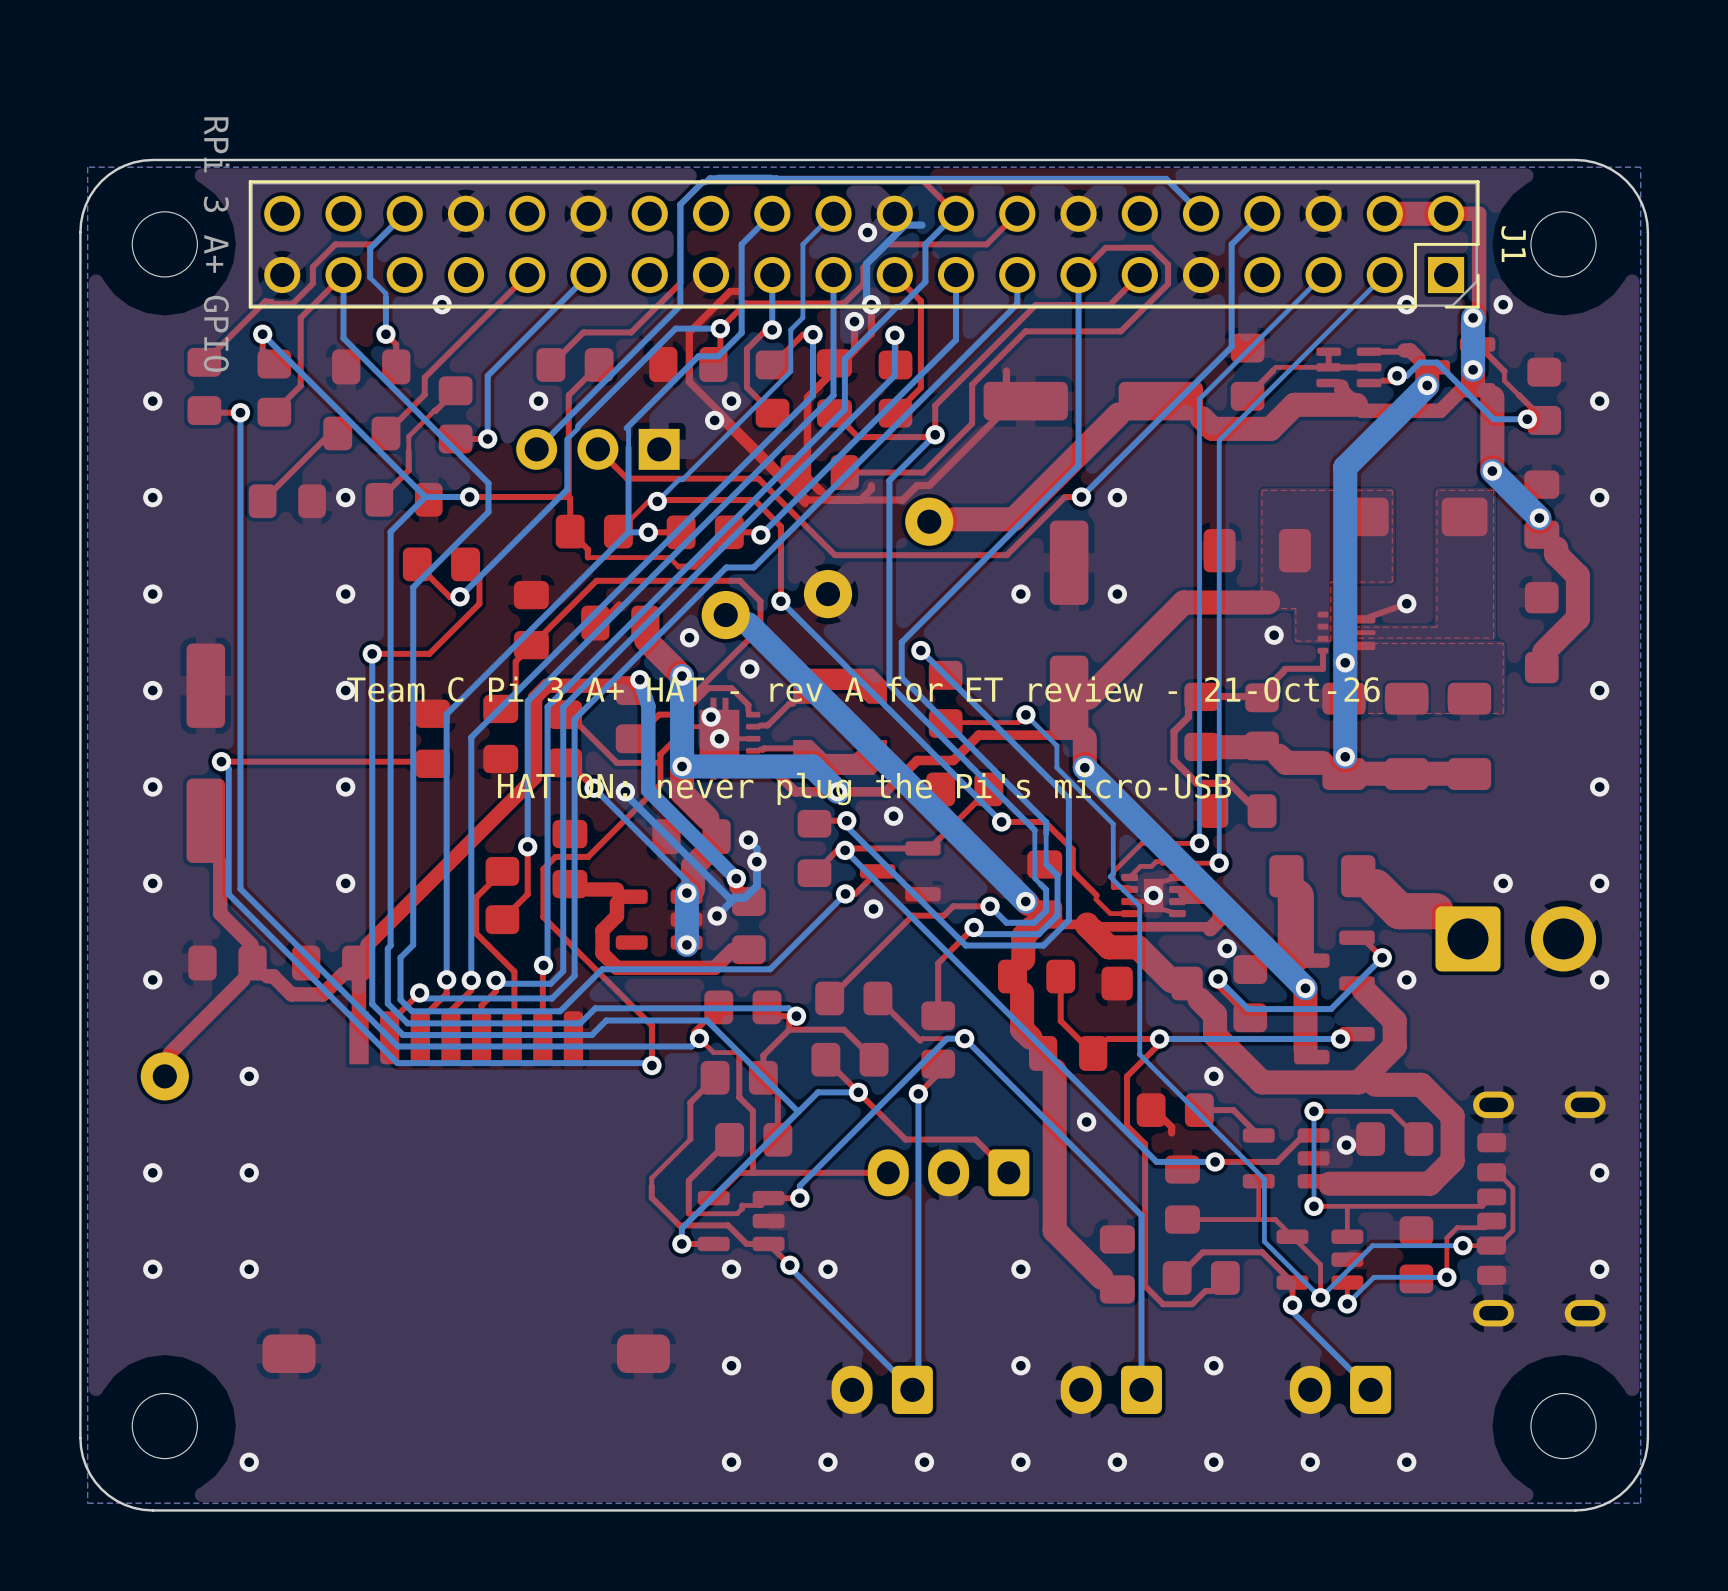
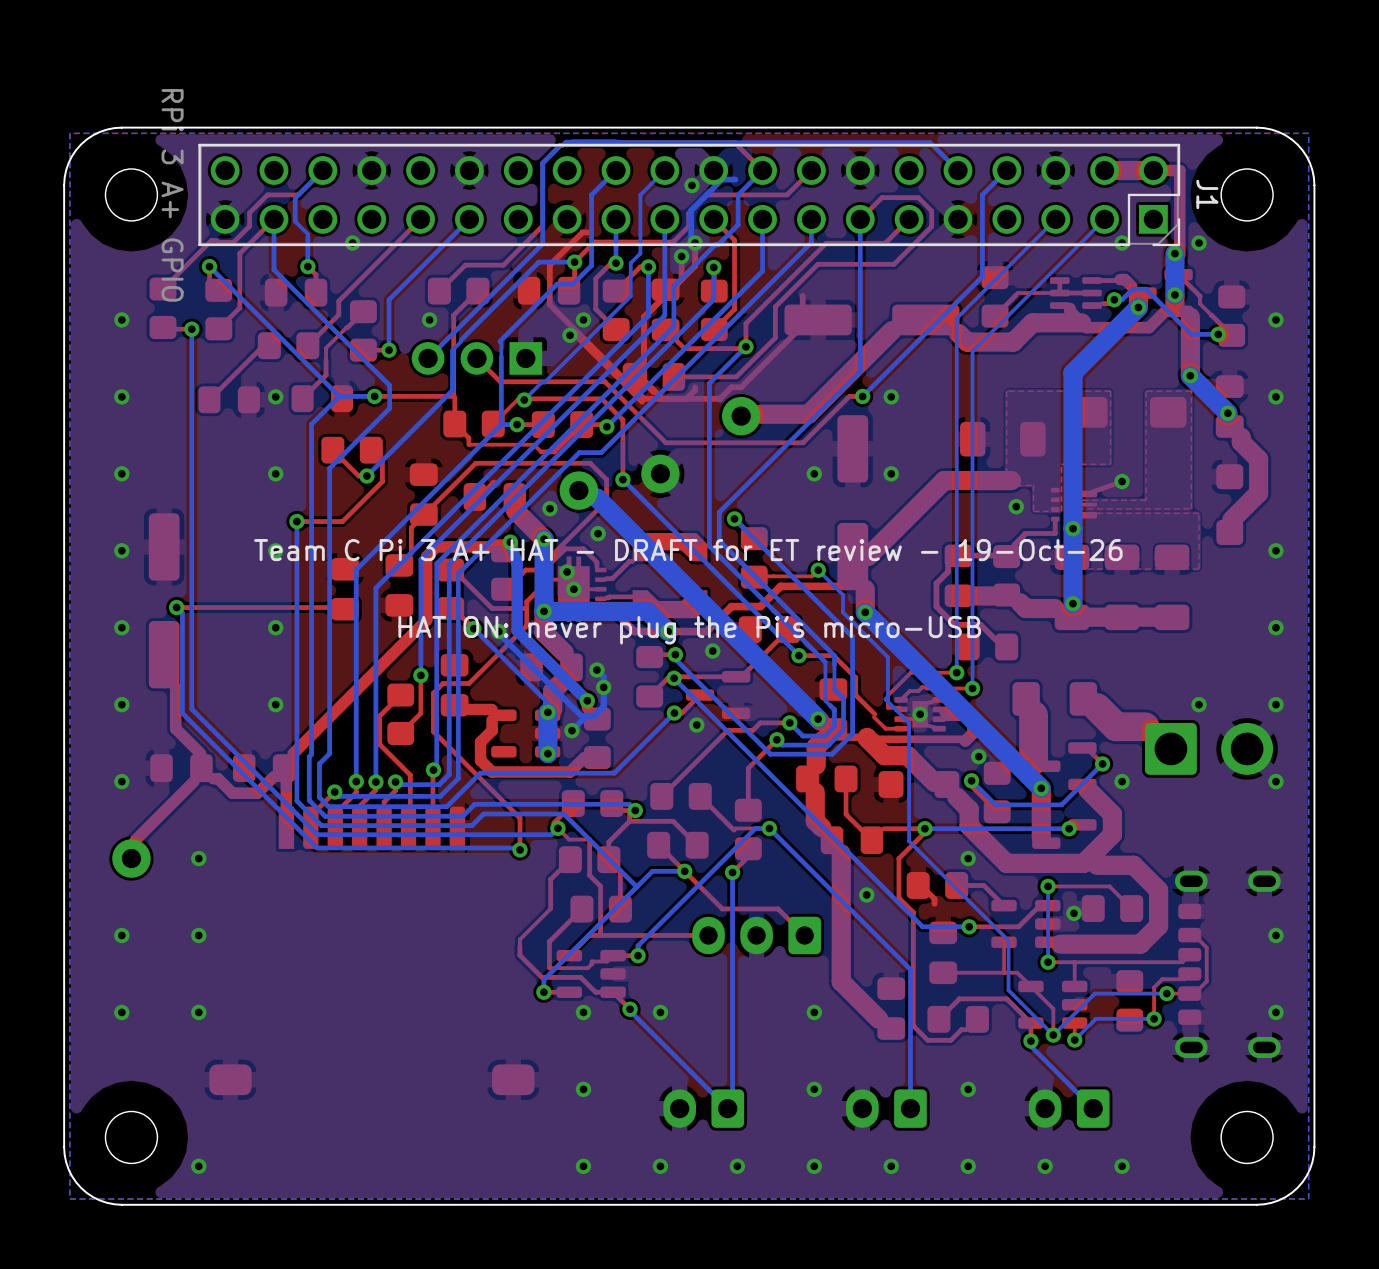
text: Team C Pi 3 A+ HAT - rev A for ET review - 21-Oct-26 (863, 689) -> Team C Pi 3 A+ HAT - DRAFT for ET review - 19-Oct-26 (688, 550)

